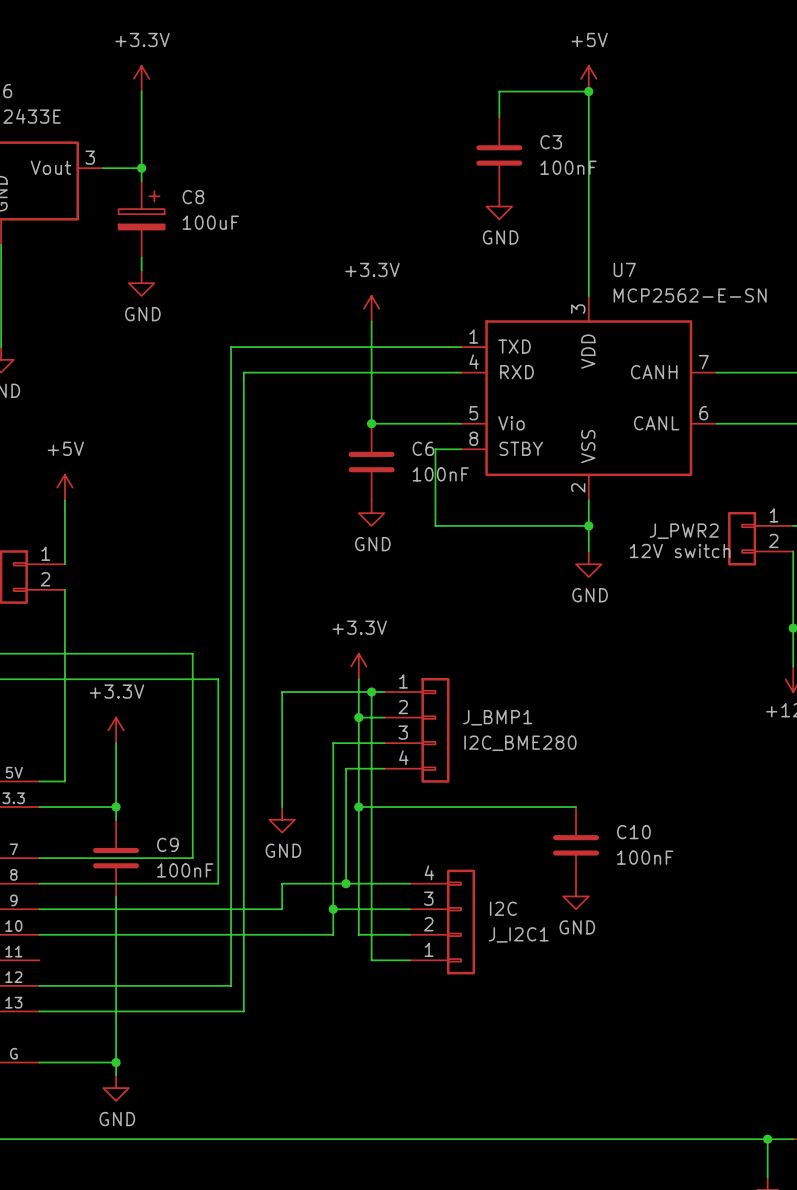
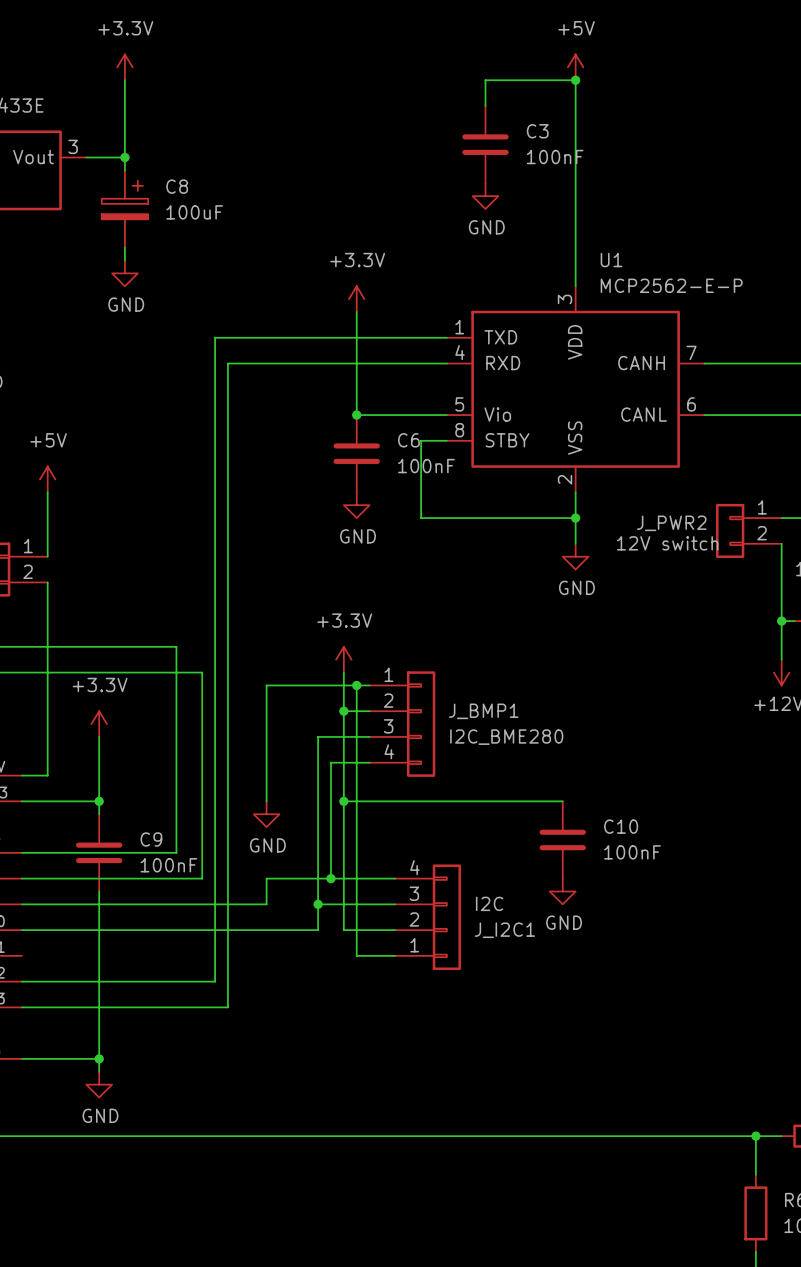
U7 name: U7 (624, 269) -> U1 (611, 260)
U7 value: MCP2562-E-SN (690, 295) -> MCP2562-E-P (671, 285)

